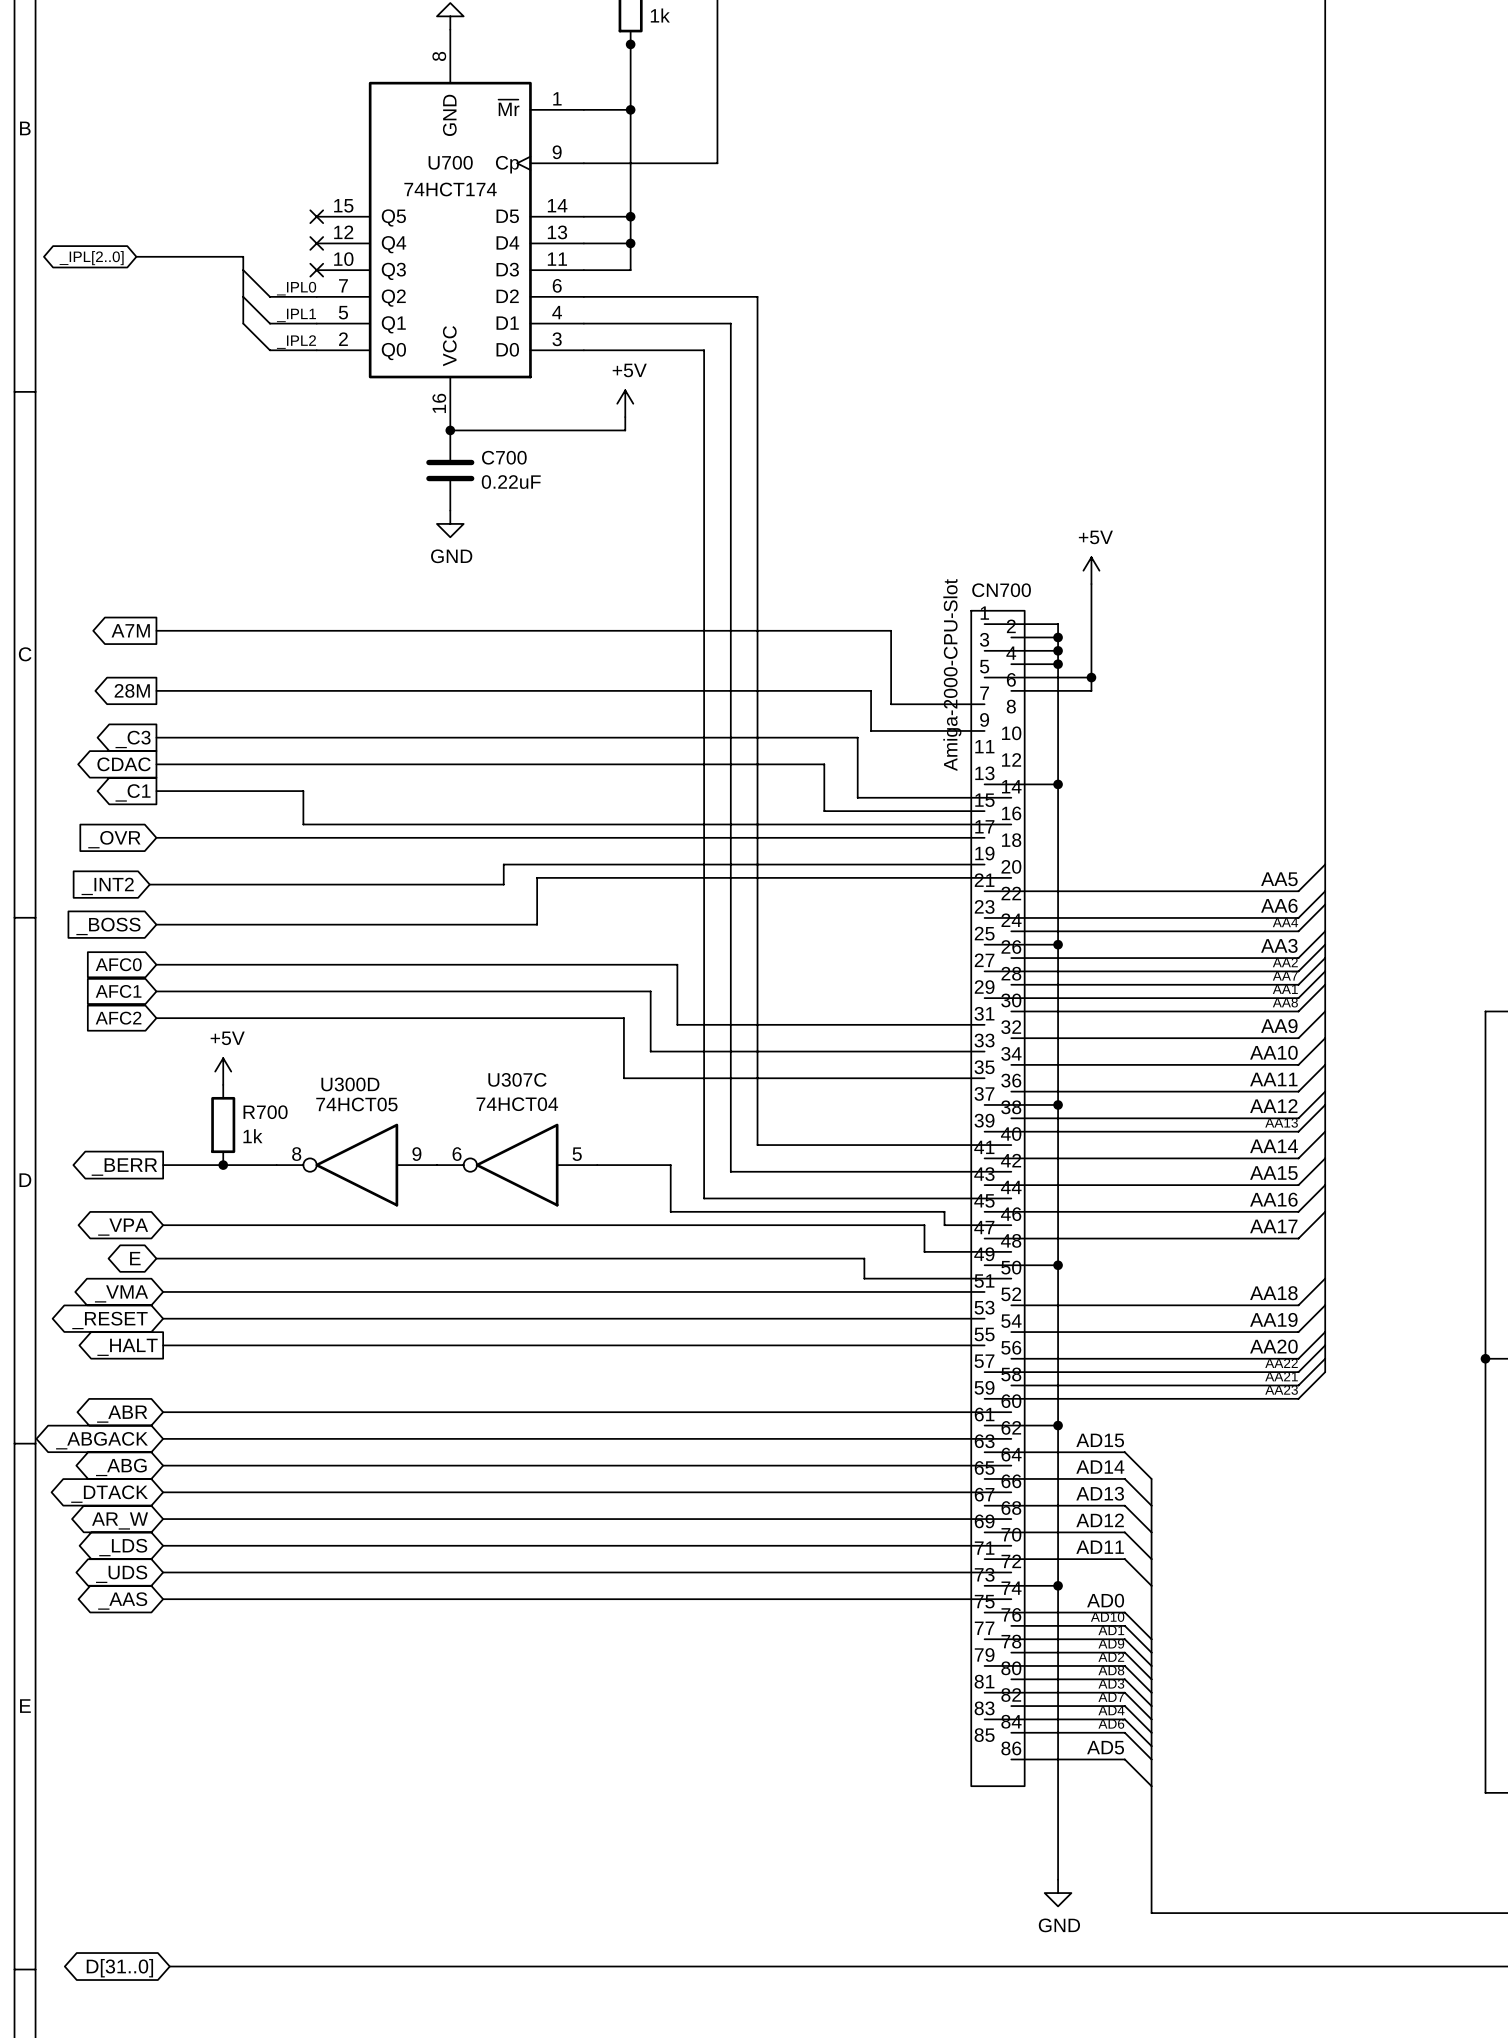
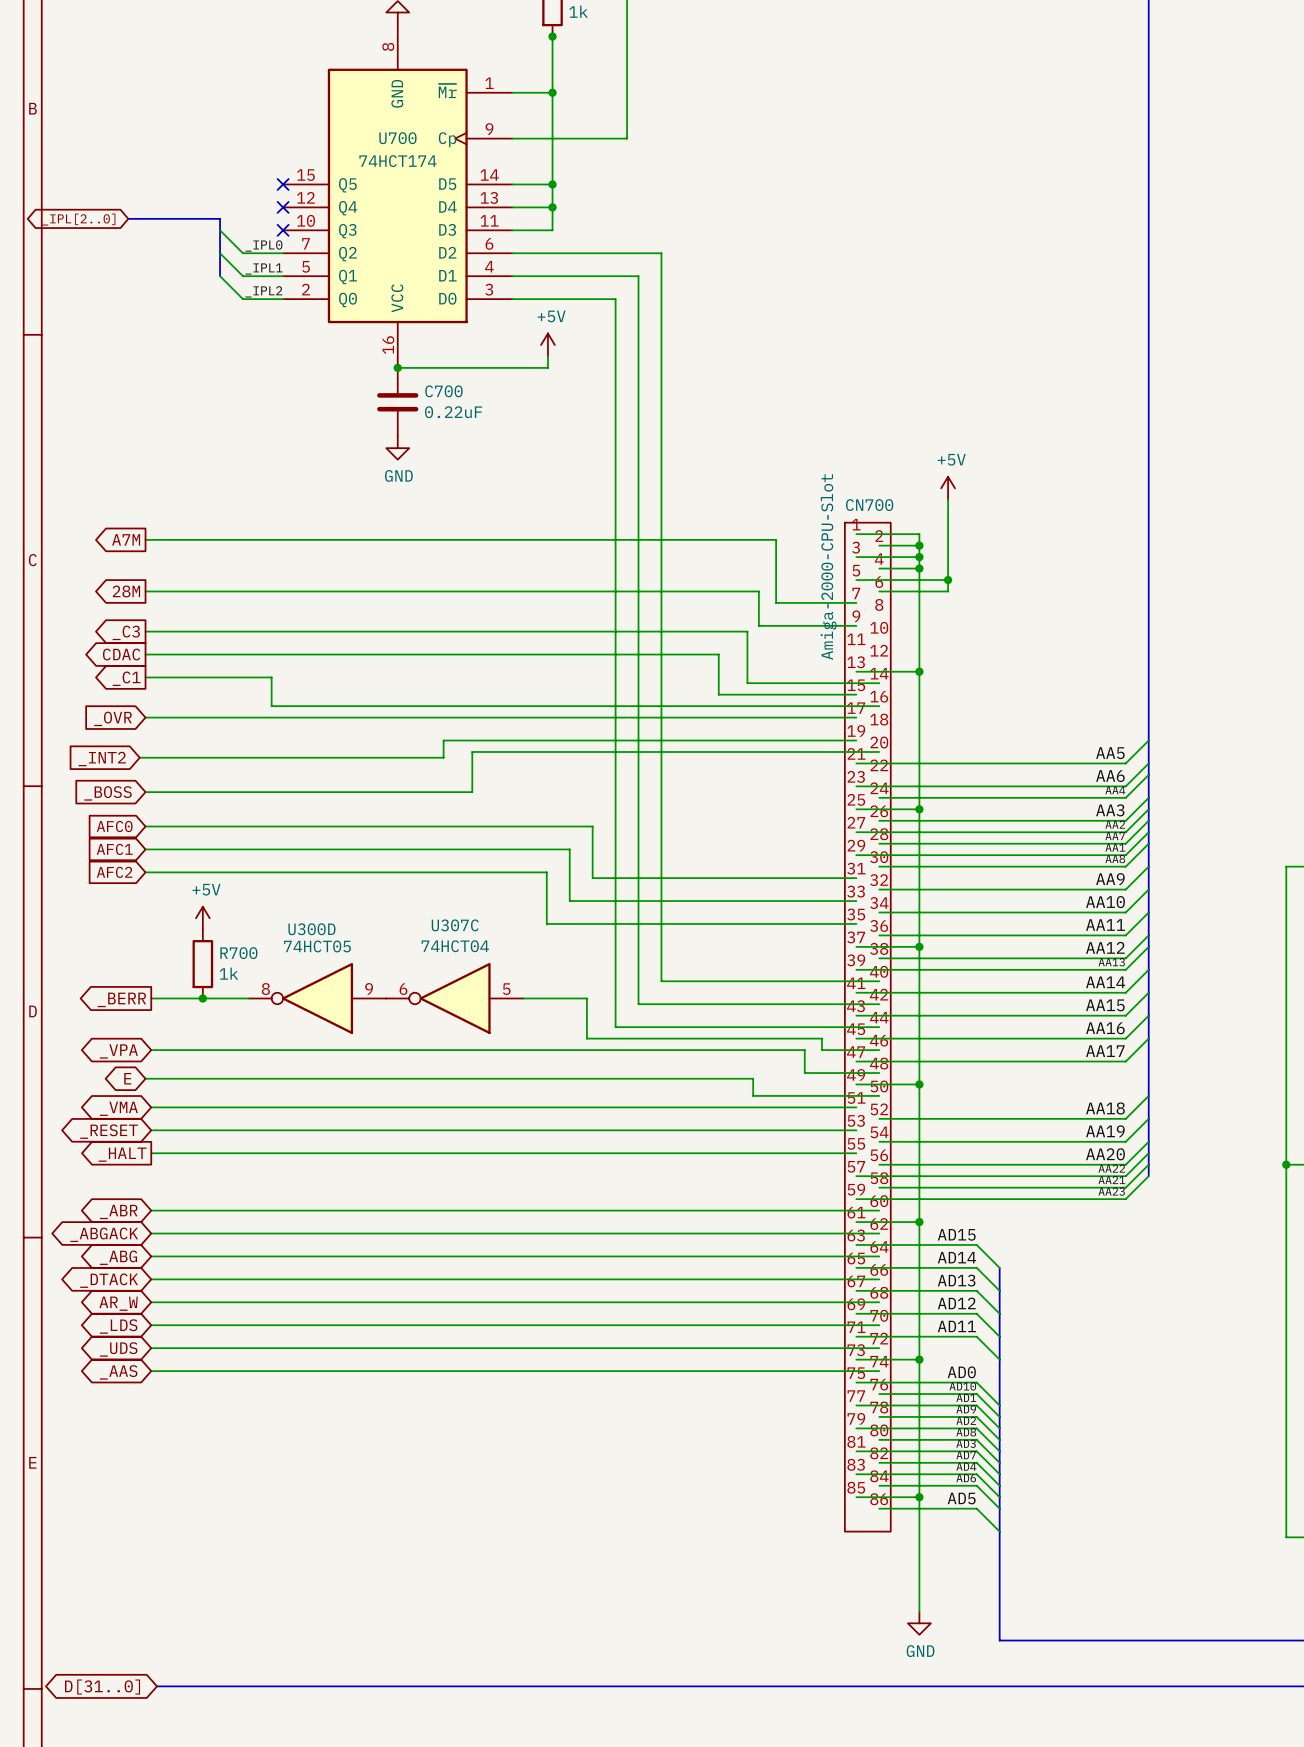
wire: none -> (856, 1497) (919, 1497)
junction: none -> (919, 1497)

